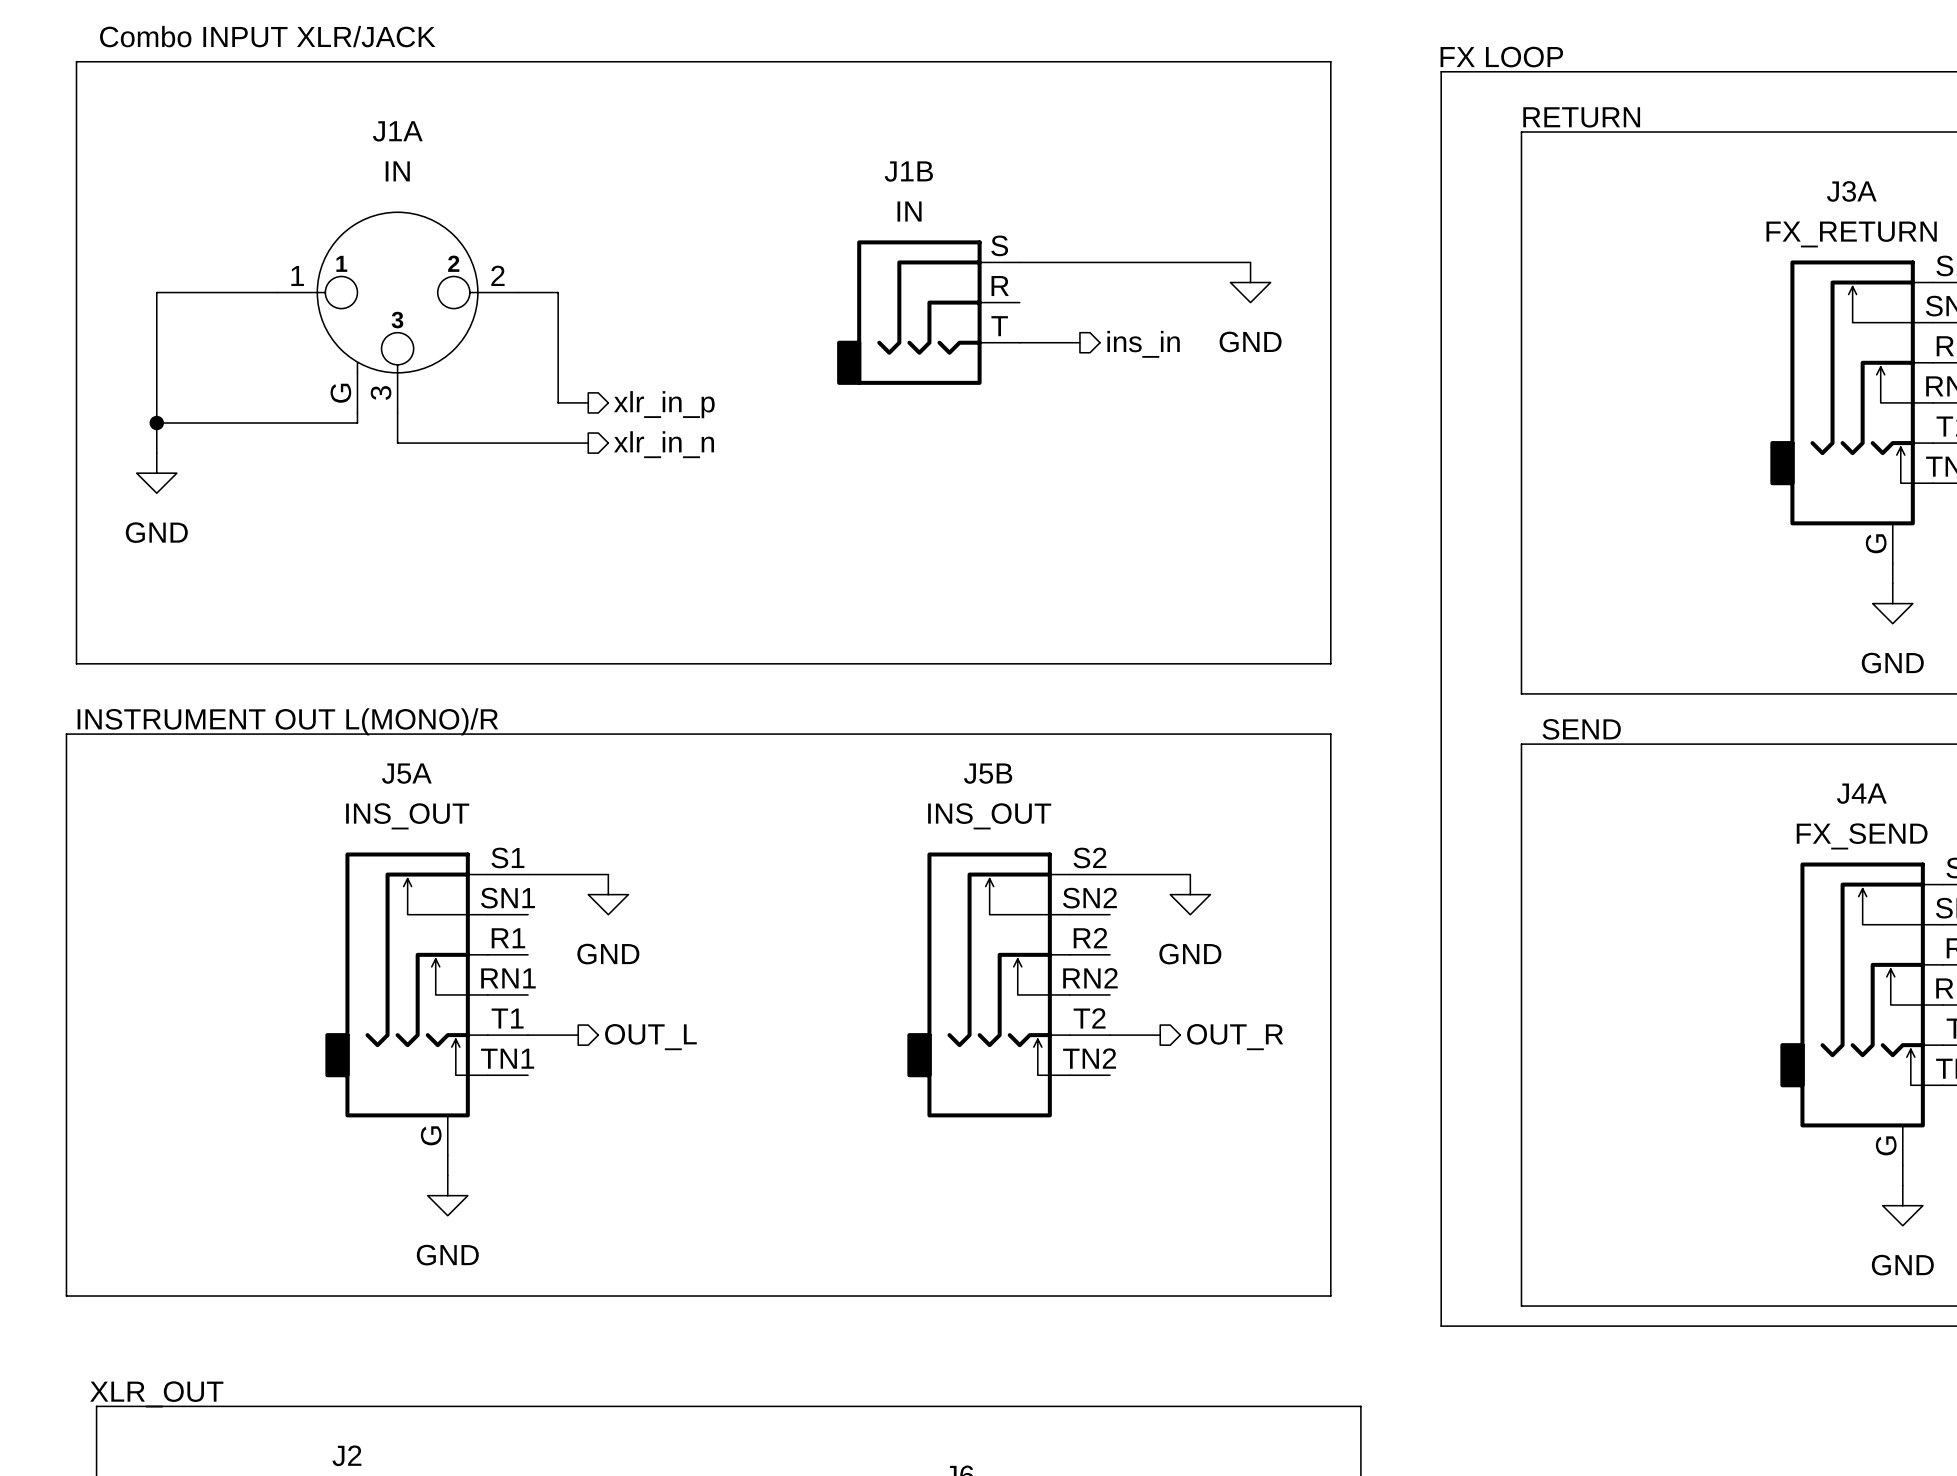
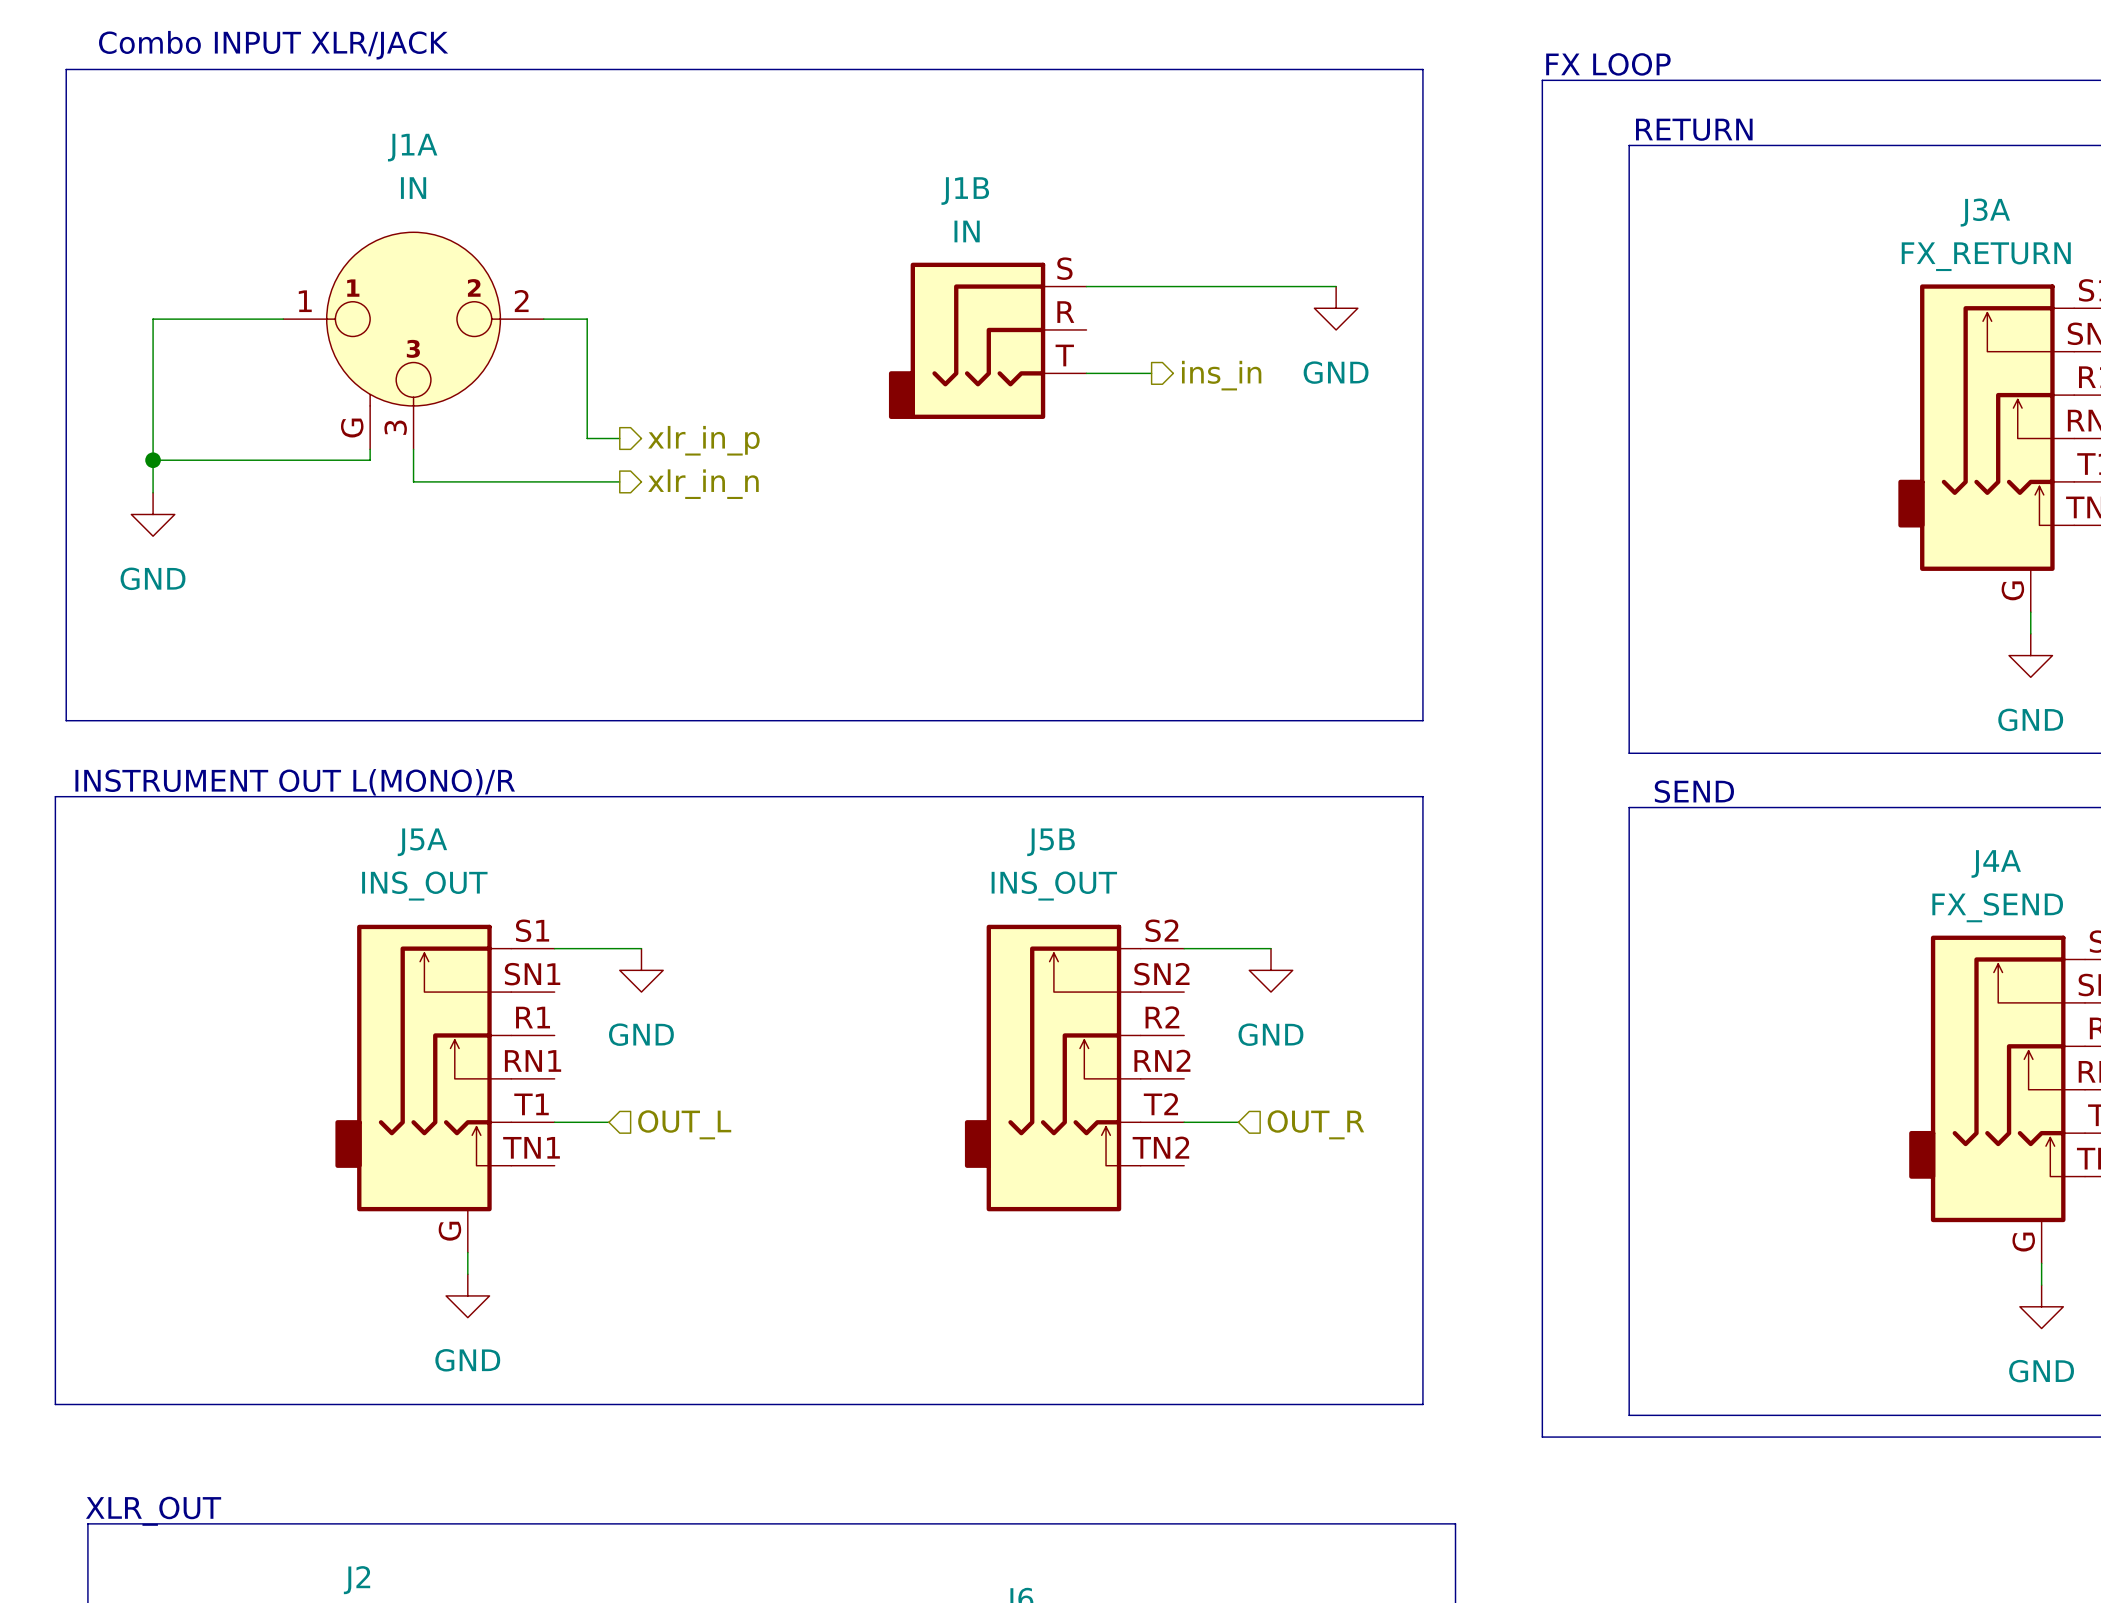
hierarchical label shape: output (650, 1037) -> input (684, 1124)
hierarchical label shape: output (1235, 1037) -> input (1315, 1124)

